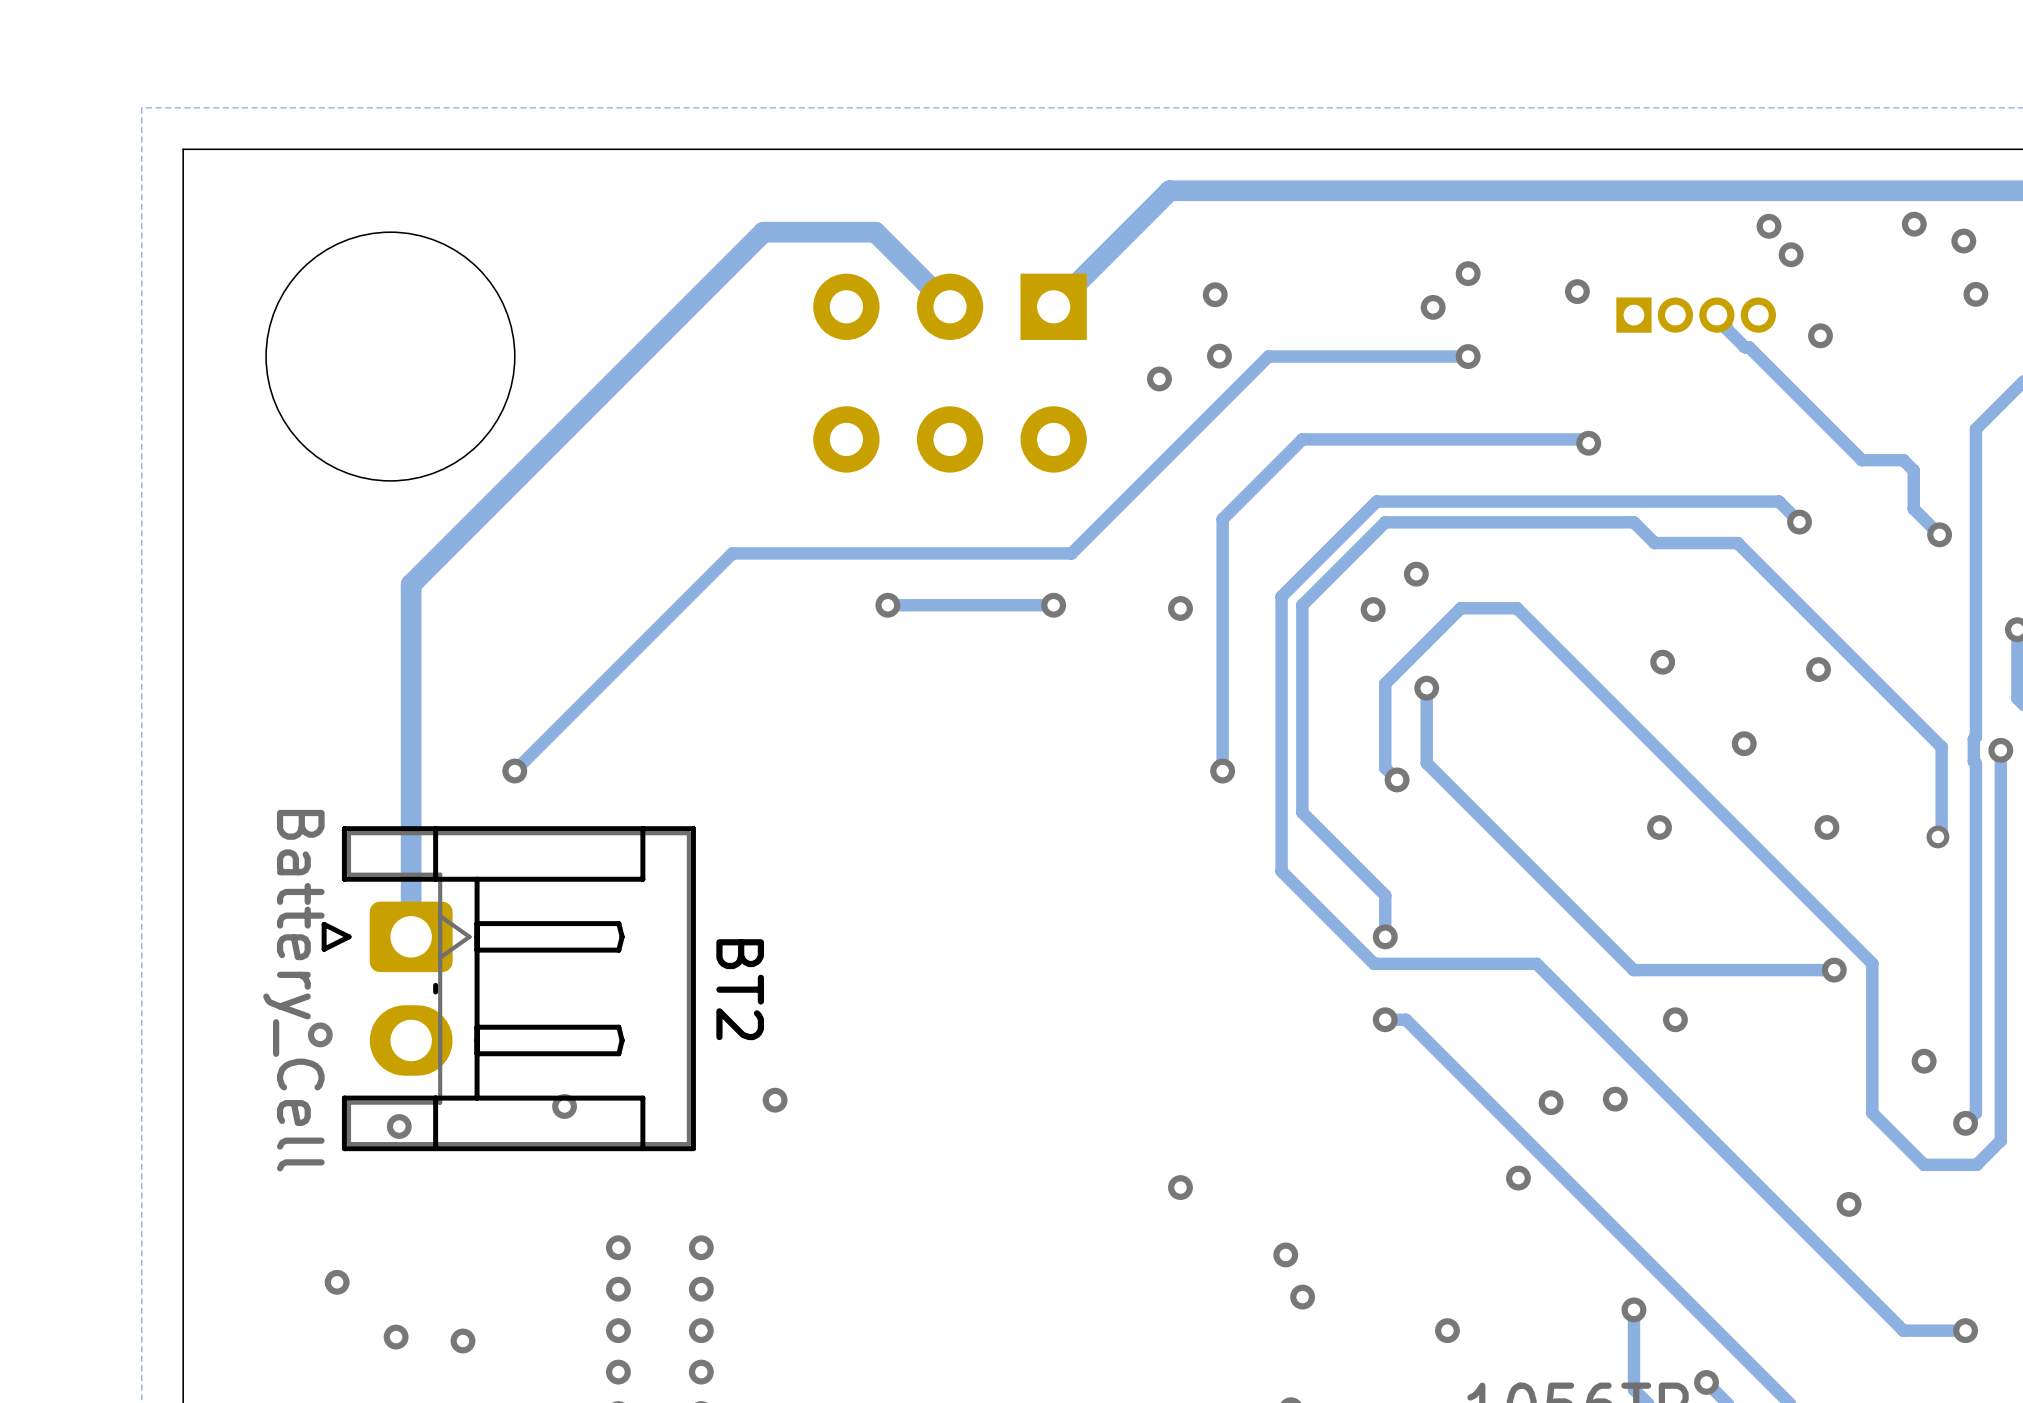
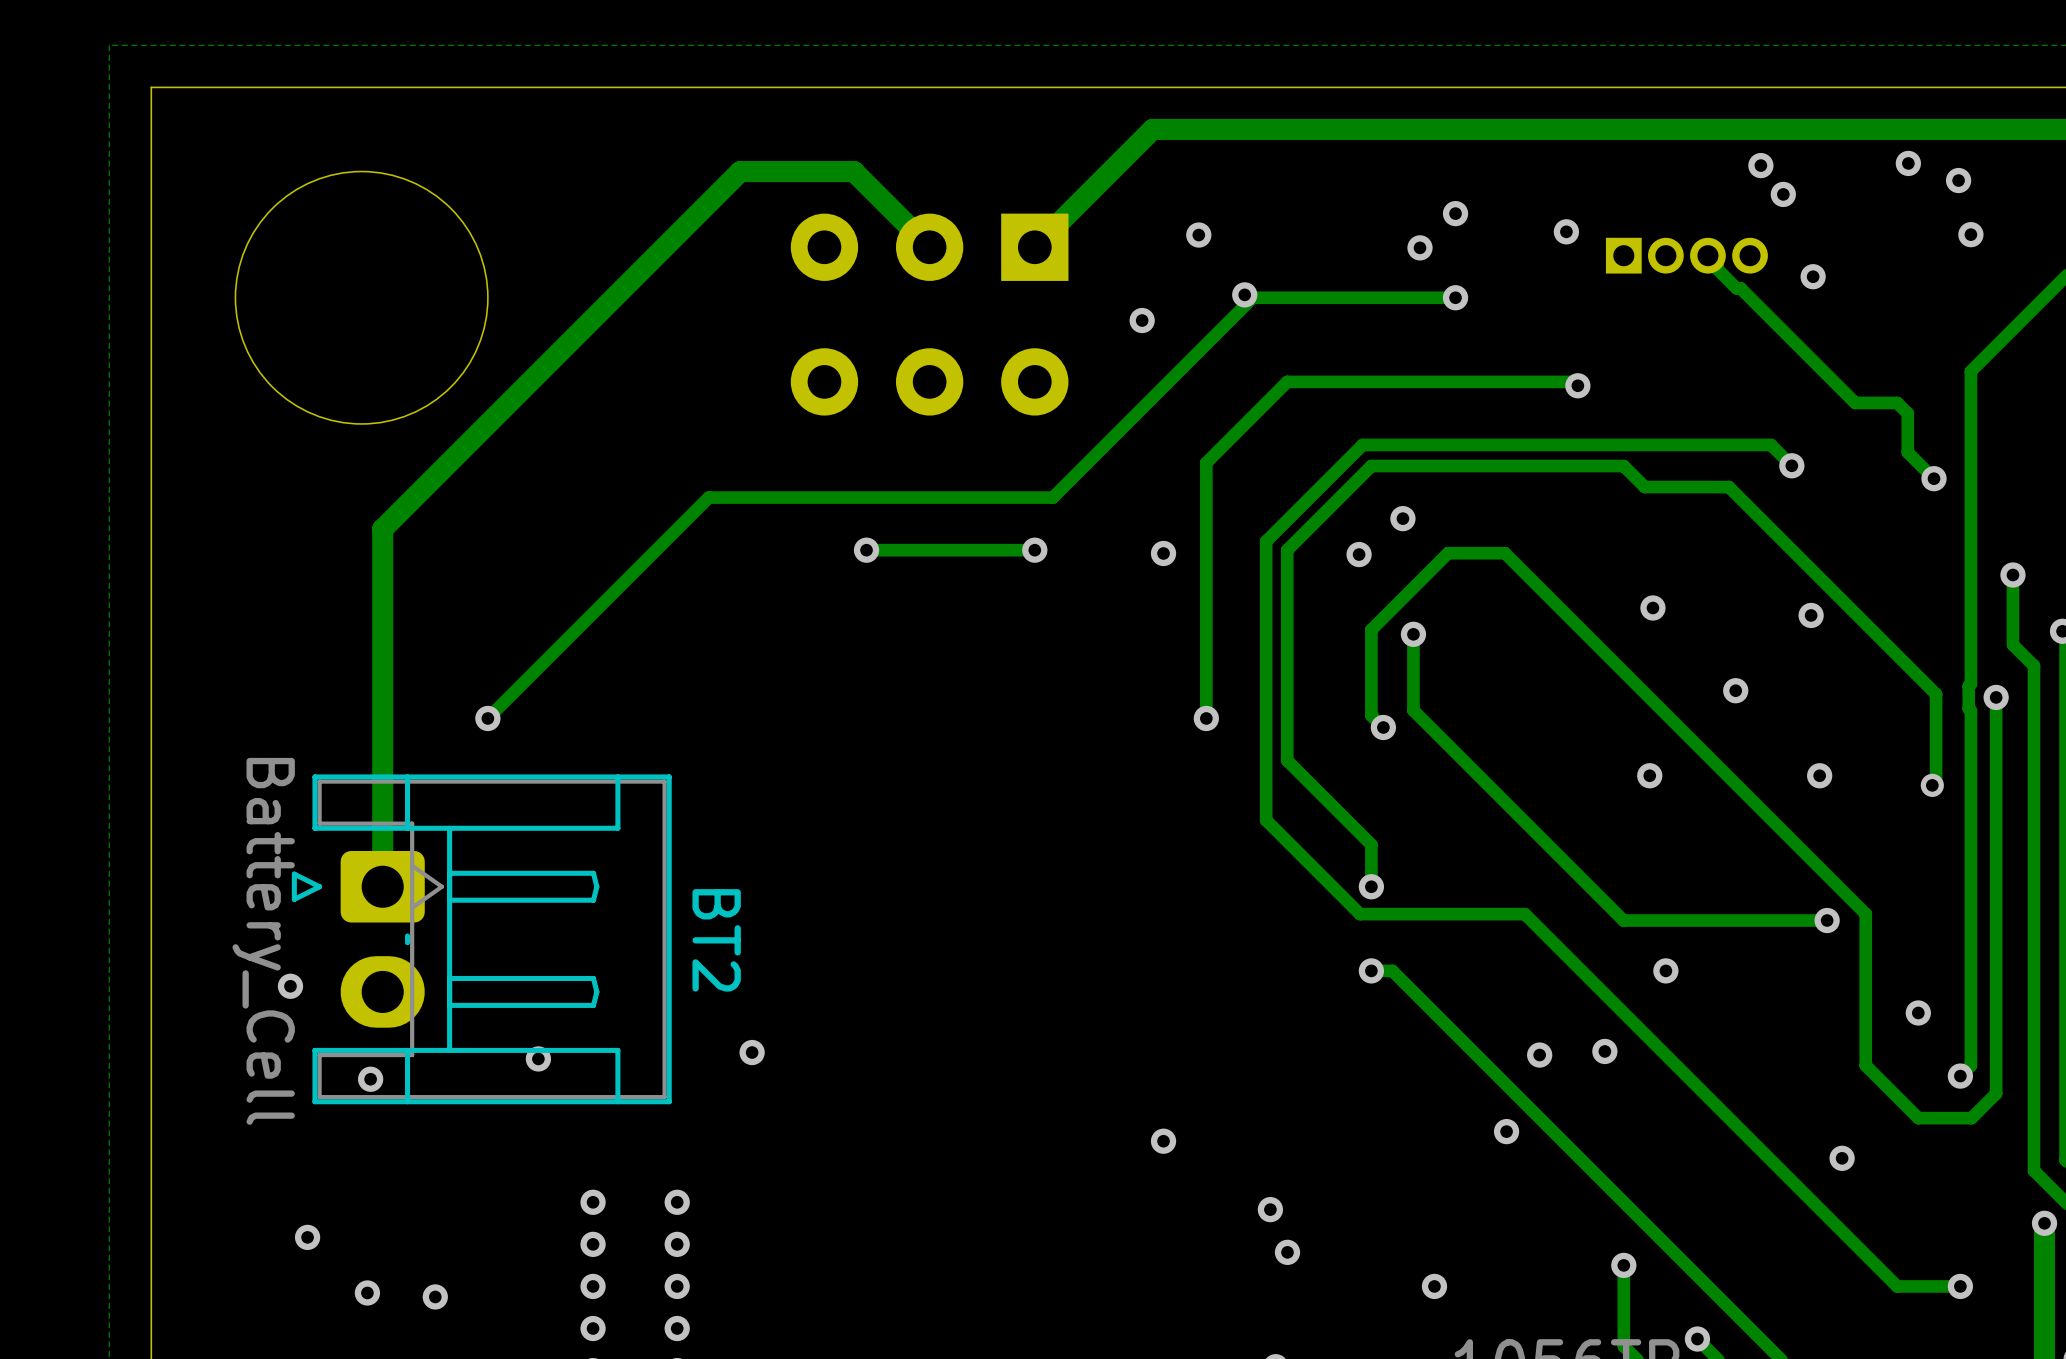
via position: (1219, 356) -> (1244, 294)

